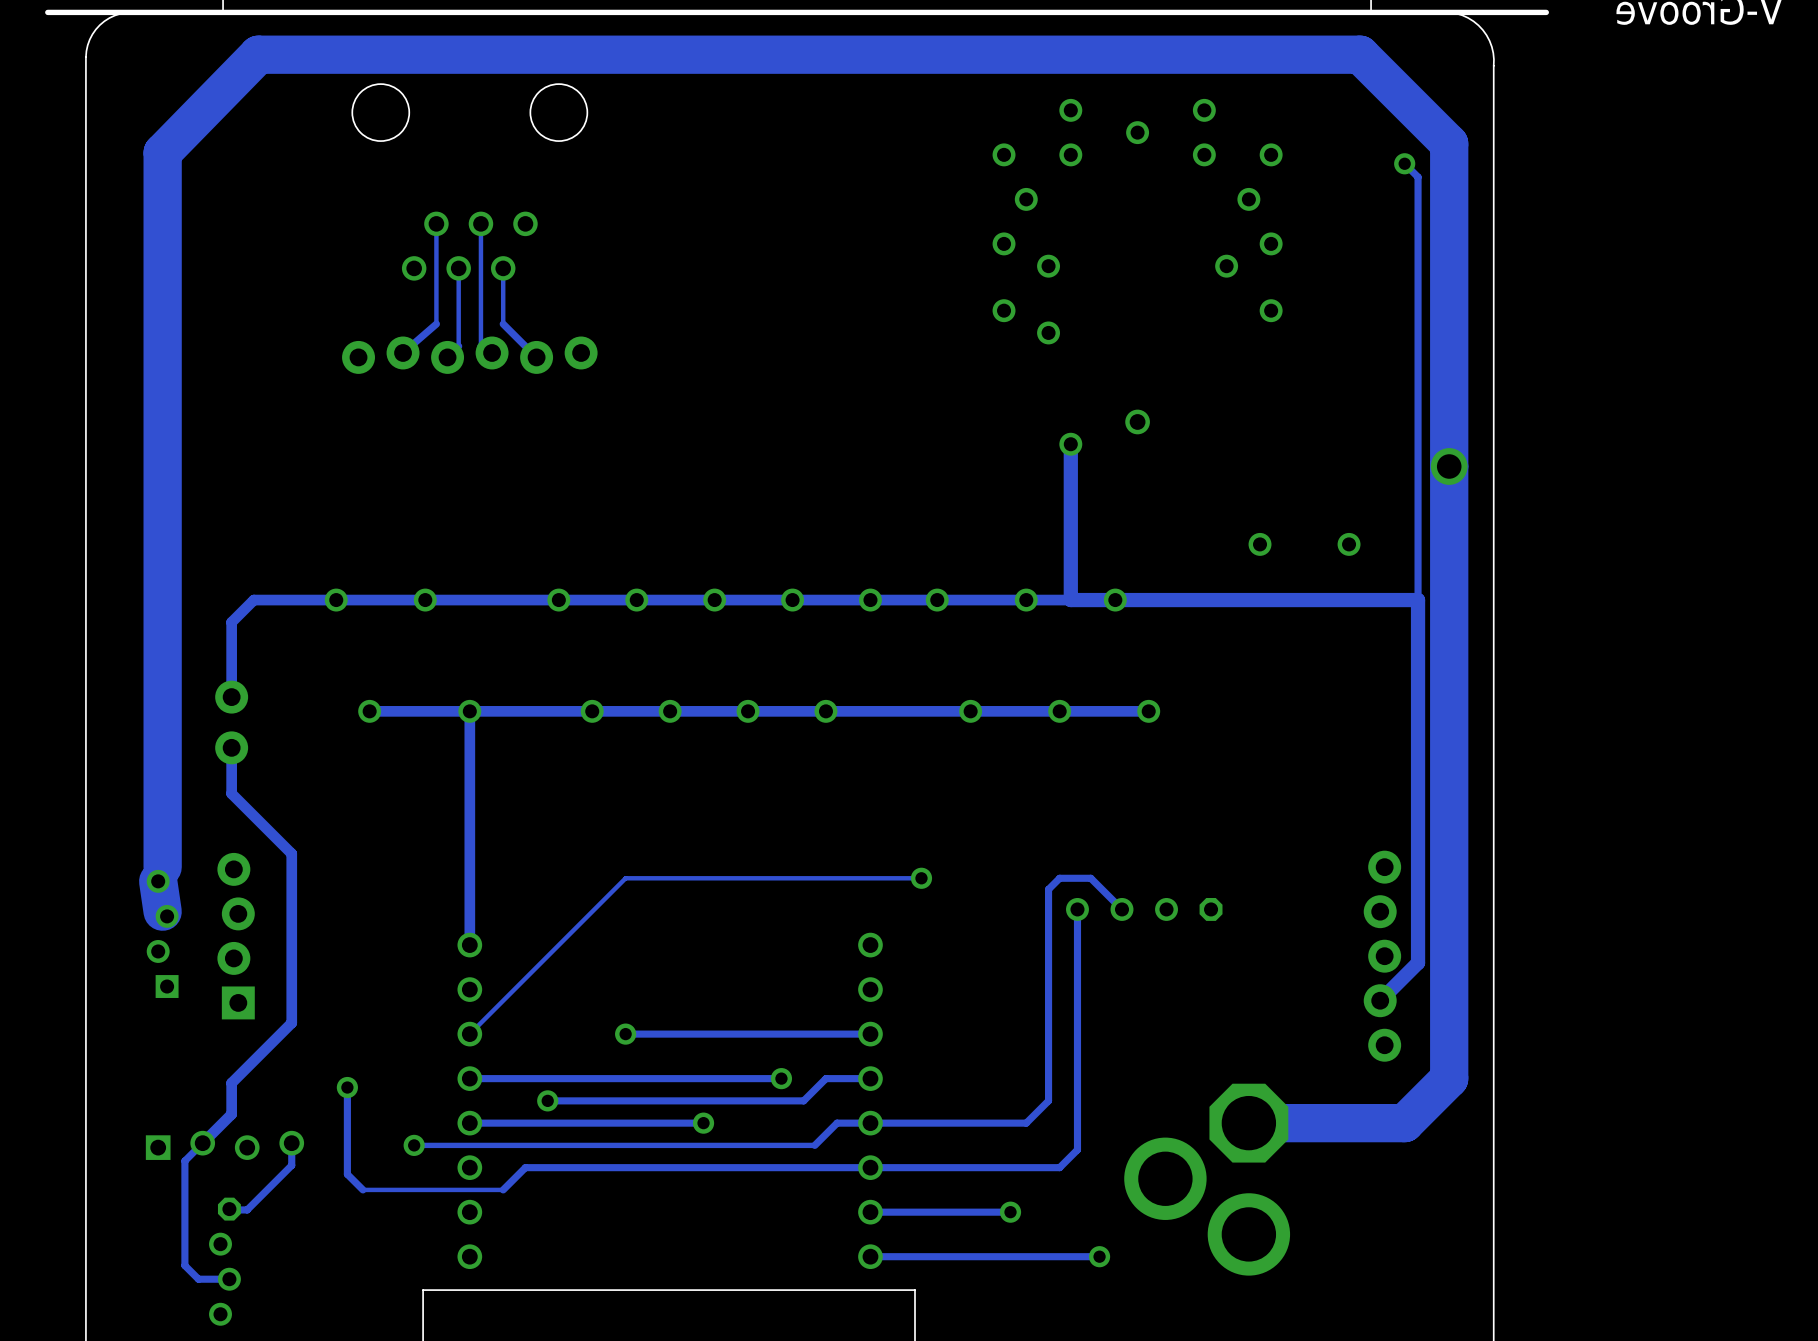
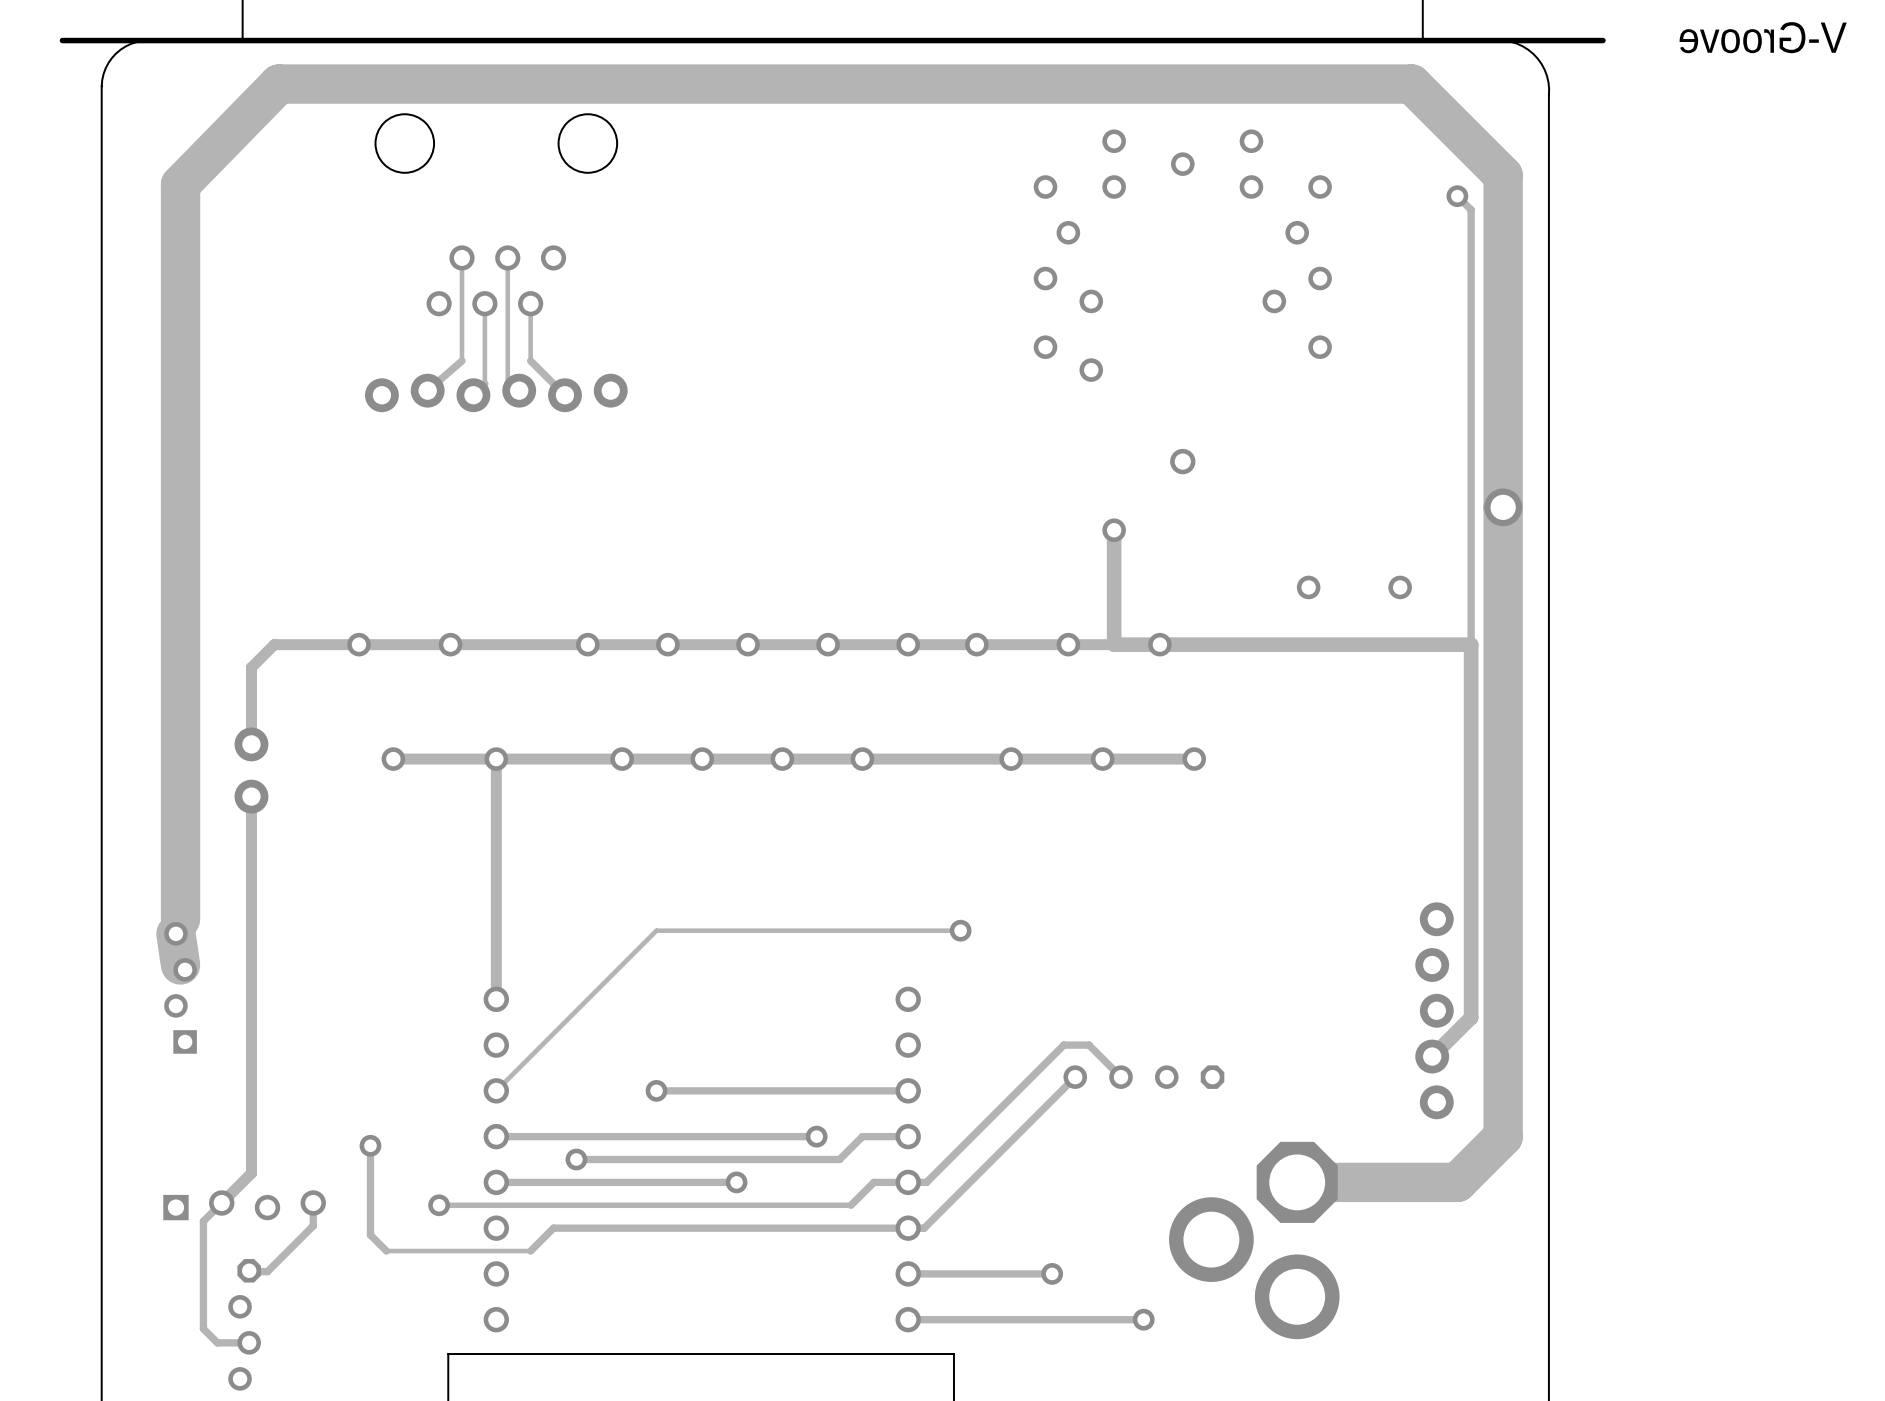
track: (1070, 444) (1070, 488) -> none
via position: (1070, 444) -> (1114, 530)
track: (231, 793) (291, 853) (291, 1022) (231, 1083) -> (251, 843) (251, 1141)
track: (1077, 909) (1077, 1149) (1059, 1167) (886, 1167) -> (1075, 1077) (924, 1228)
track: (1122, 909) (1090, 878) (1059, 878) (1048, 889) (1048, 1100) (1026, 1123) (888, 1123) -> (1121, 1077) (1088, 1045) (1063, 1045) (926, 1182)
part position: (1144, 909) -> (1143, 1077)
part: (236, 936) -> none

